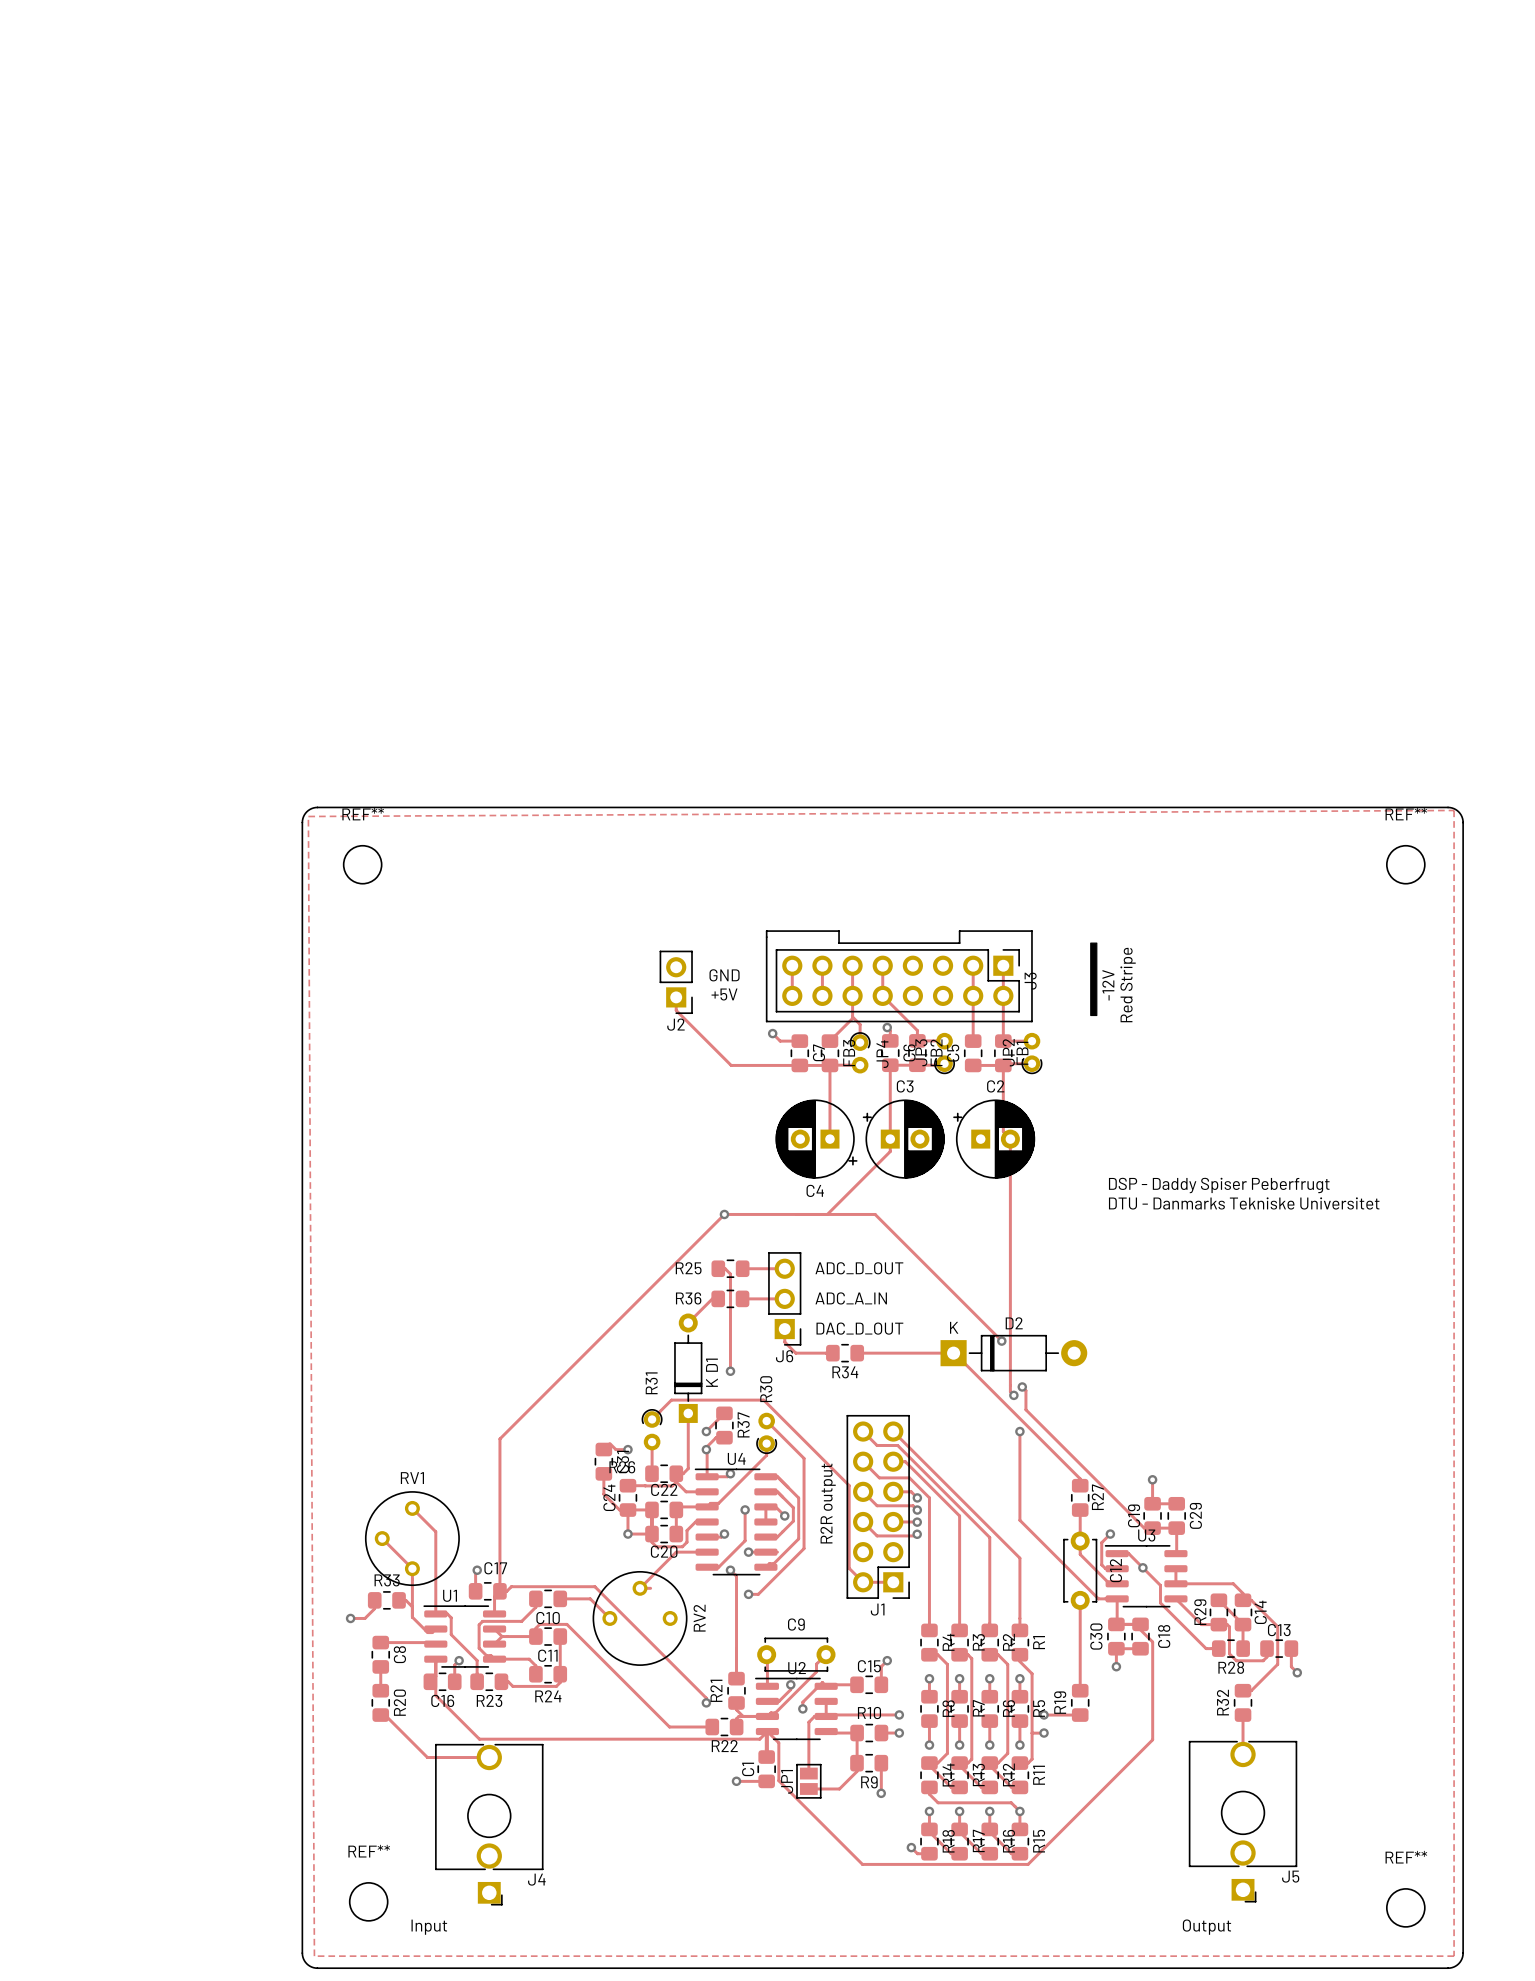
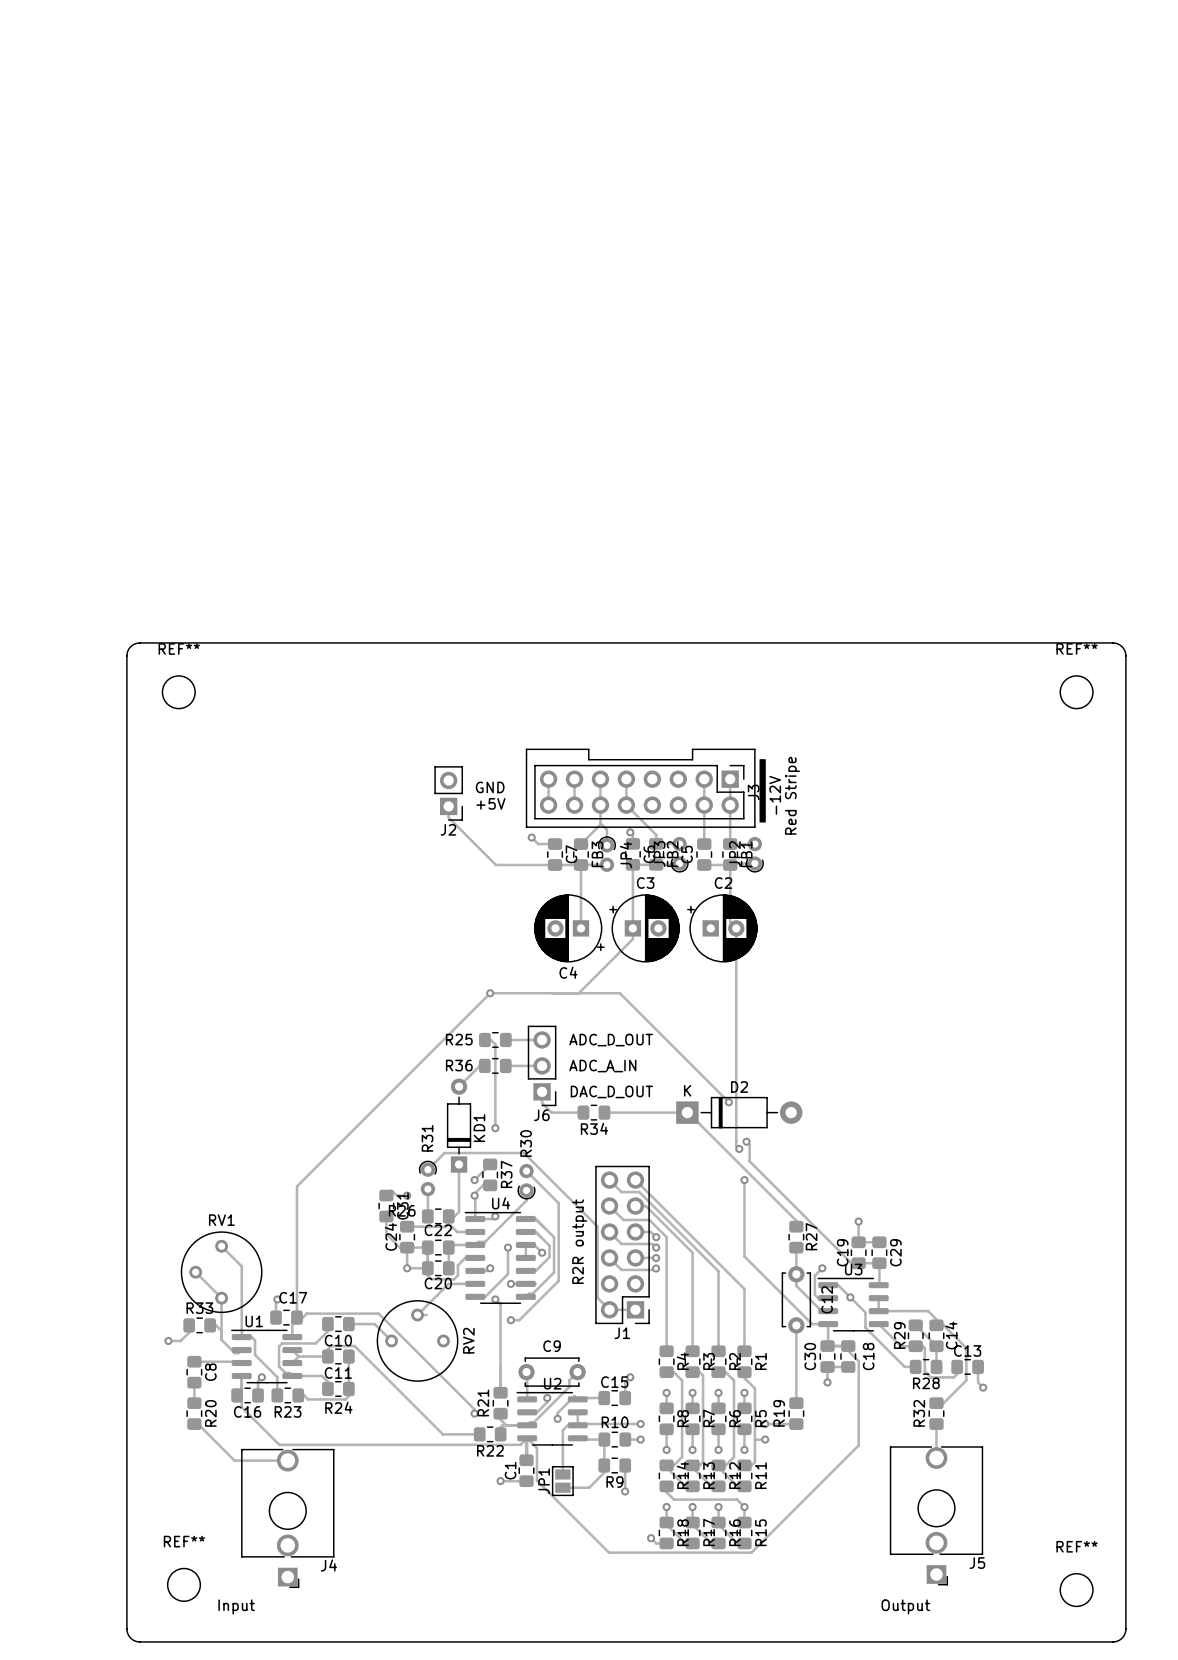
zone outline: (1454, 810) (308, 816) (314, 1956) (1454, 1956) (1454, 810) -> none
drawing position: (1093, 979) -> (762, 790)
text position: -12V (1108, 985) -> -12V (775, 795)
text position: Red Stripe (1128, 985) -> Red Stripe (792, 795)
text: DSP - Daddy Spiser Peberfrugt (1219, 1185) -> none
text: DTU - Danmarks Tekniske Universitet (1244, 1203) -> none

